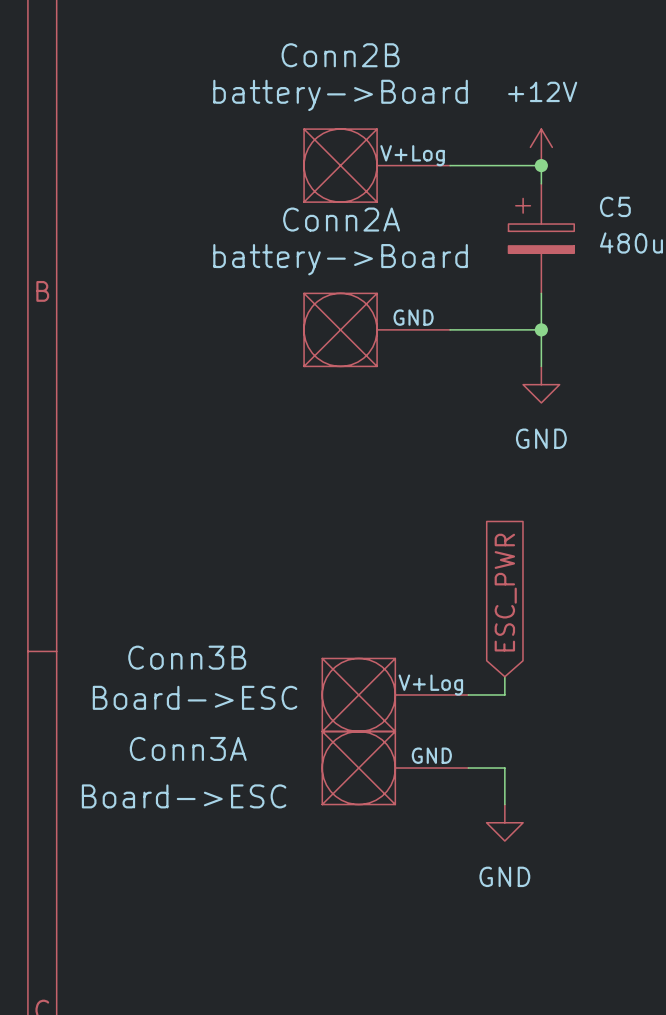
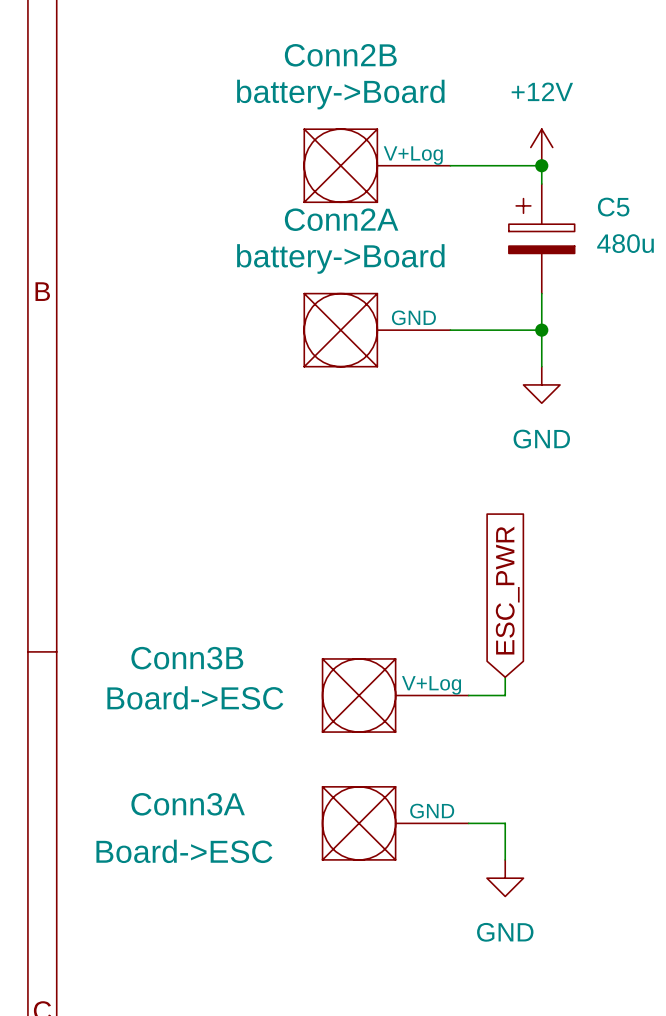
Conn3A position: (395, 768) -> (395, 823)
wire: (468, 768) (504, 768) (504, 804) -> (468, 823) (505, 823) (505, 859)
power symbol position: GND (504, 822) -> GND (505, 878)

